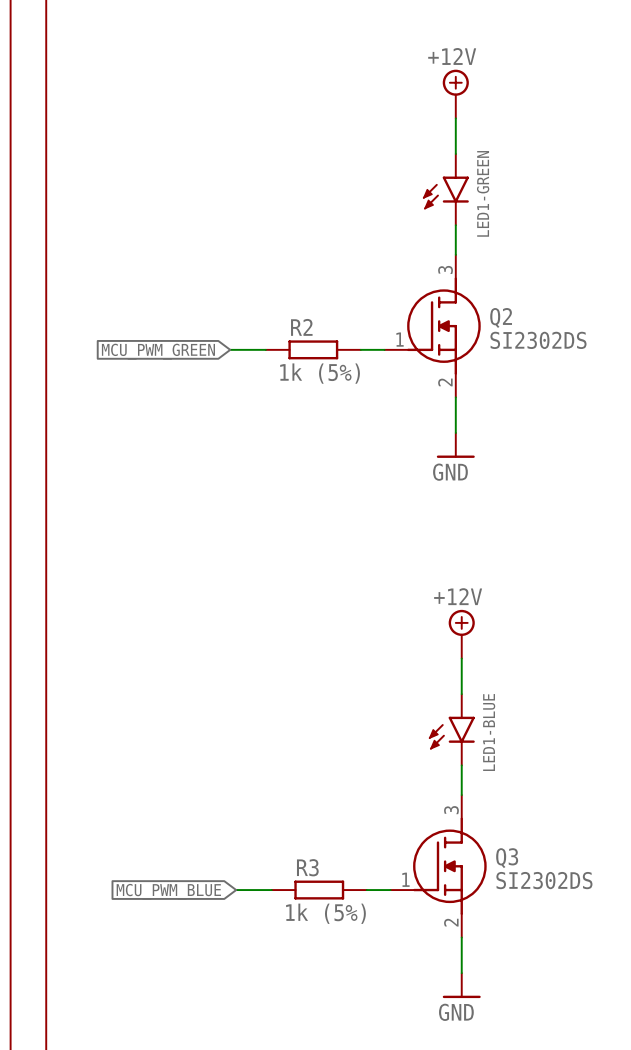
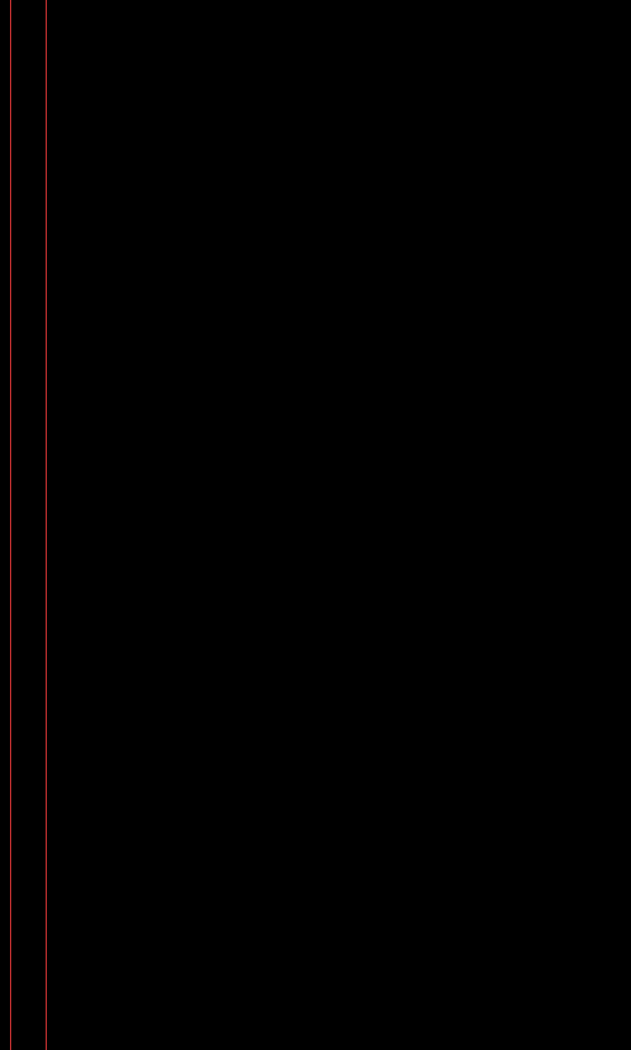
power symbol: +12V (455, 94) -> none
wire: (455, 118) (455, 153) -> none
line: (455, 153) (455, 177) -> none
LED1-GREEN: (445, 200) -> none
wire: (455, 225) (455, 254) -> none
Q2: SI2302DS (432, 326) -> none
wire: (230, 349) (265, 349) -> none
R2: 1k (5%) (313, 349) -> none
wire: (360, 349) (384, 349) -> none
global label: MCU_PWM_GREEN (158, 351) -> none
wire: (455, 397) (455, 432) -> none
power symbol: GND (455, 445) -> none
power symbol: +12V (461, 634) -> none
wire: (461, 658) (461, 694) -> none
line: (461, 694) (461, 717) -> none
LED1-BLUE: (451, 741) -> none
wire: (461, 765) (461, 795) -> none
Q3: SI2302DS (438, 866) -> none
wire: (236, 890) (271, 890) -> none
R3: 1k (5%) (319, 890) -> none
wire: (366, 890) (390, 890) -> none
global label: MCU_PWM_BLUE (168, 891) -> none
wire: (461, 937) (461, 973) -> none
power symbol: GND (461, 985) -> none

